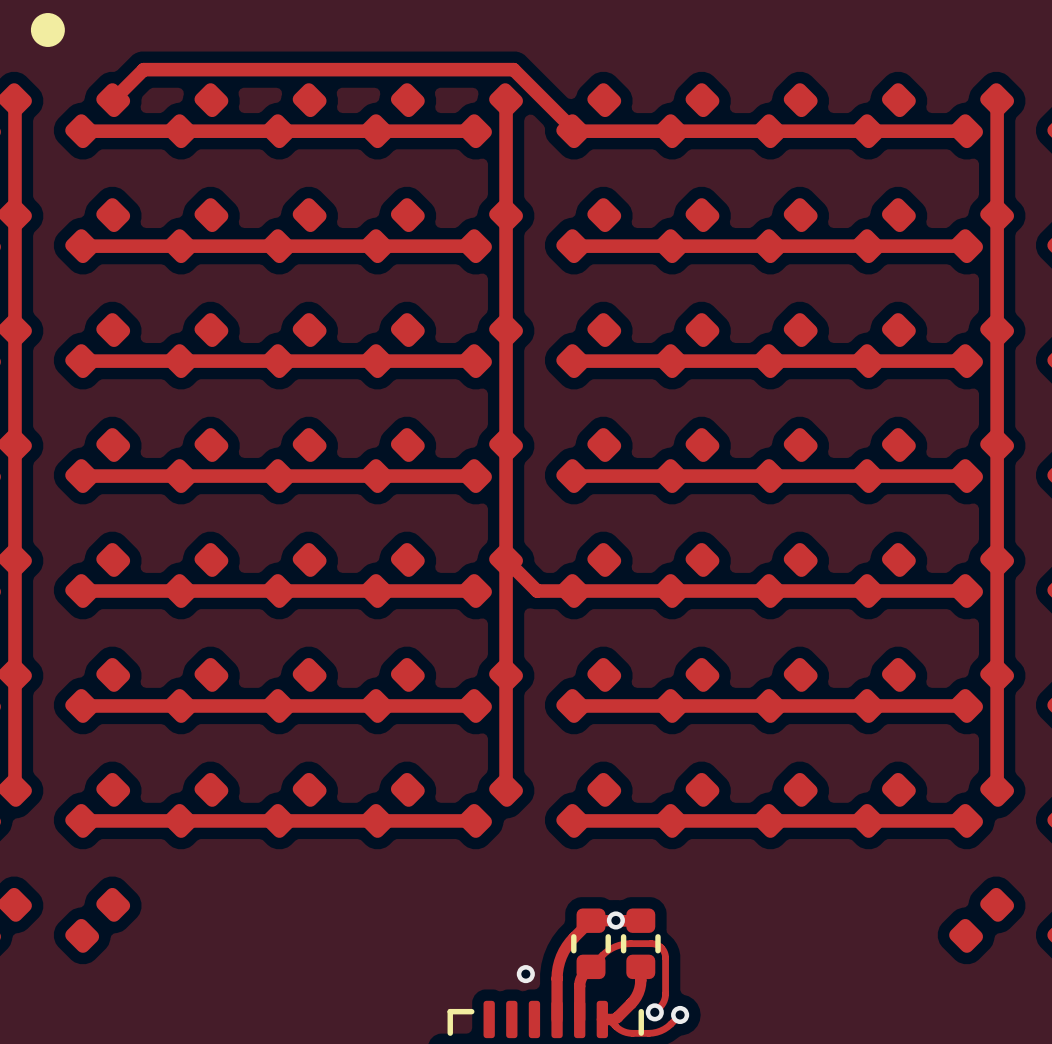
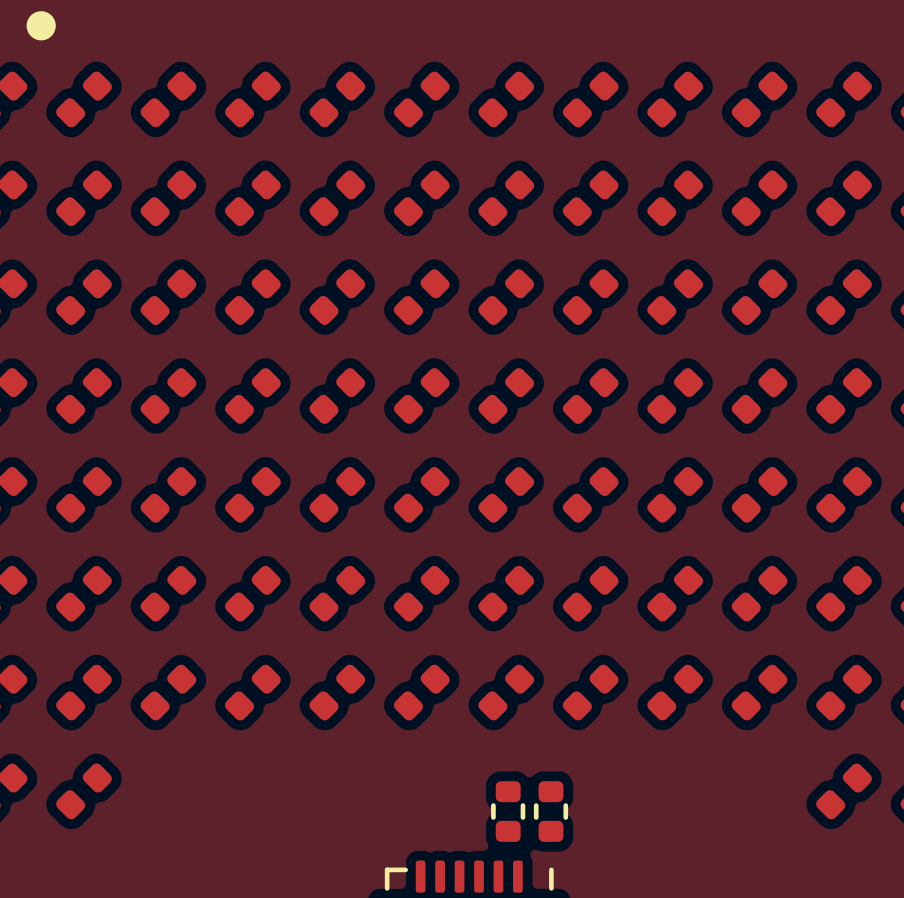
track: (15, 100) (15, 789) -> none
track: (113, 100) (143, 69) (513, 69) (573, 131) (966, 131) -> none
track: (506, 100) (506, 789) -> none
track: (997, 100) (997, 789) -> none
track: (82, 131) (475, 131) -> none
track: (82, 246) (475, 246) -> none
track: (573, 246) (966, 246) -> none
track: (82, 361) (475, 361) -> none
track: (573, 361) (966, 361) -> none
track: (82, 476) (475, 476) -> none
track: (573, 476) (966, 476) -> none
track: (506, 559) (537, 591) (966, 591) -> none
track: (82, 591) (475, 591) -> none
track: (82, 705) (475, 705) -> none
track: (573, 705) (966, 705) -> none
track: (82, 820) (475, 820) -> none
track: (573, 820) (966, 820) -> none
via: (615, 920) -> none
track: (640, 920) (591, 920) (570, 941) (563, 951) (558, 967) (557, 1019) -> none
track: (640, 966) (639, 988) (634, 1000) (616, 1018) (602, 1019) -> none
via: (525, 974) -> none
track: (654, 1012) (663, 1003) (665, 996) (664, 952) (660, 946) (654, 943) (626, 943) (608, 950) (582, 975) (579, 984) (579, 1019) -> none
via: (654, 1012) -> none
track: (680, 1014) (664, 1029) (648, 1033) (623, 1031) (608, 1019) -> none
via: (680, 1014) -> none

